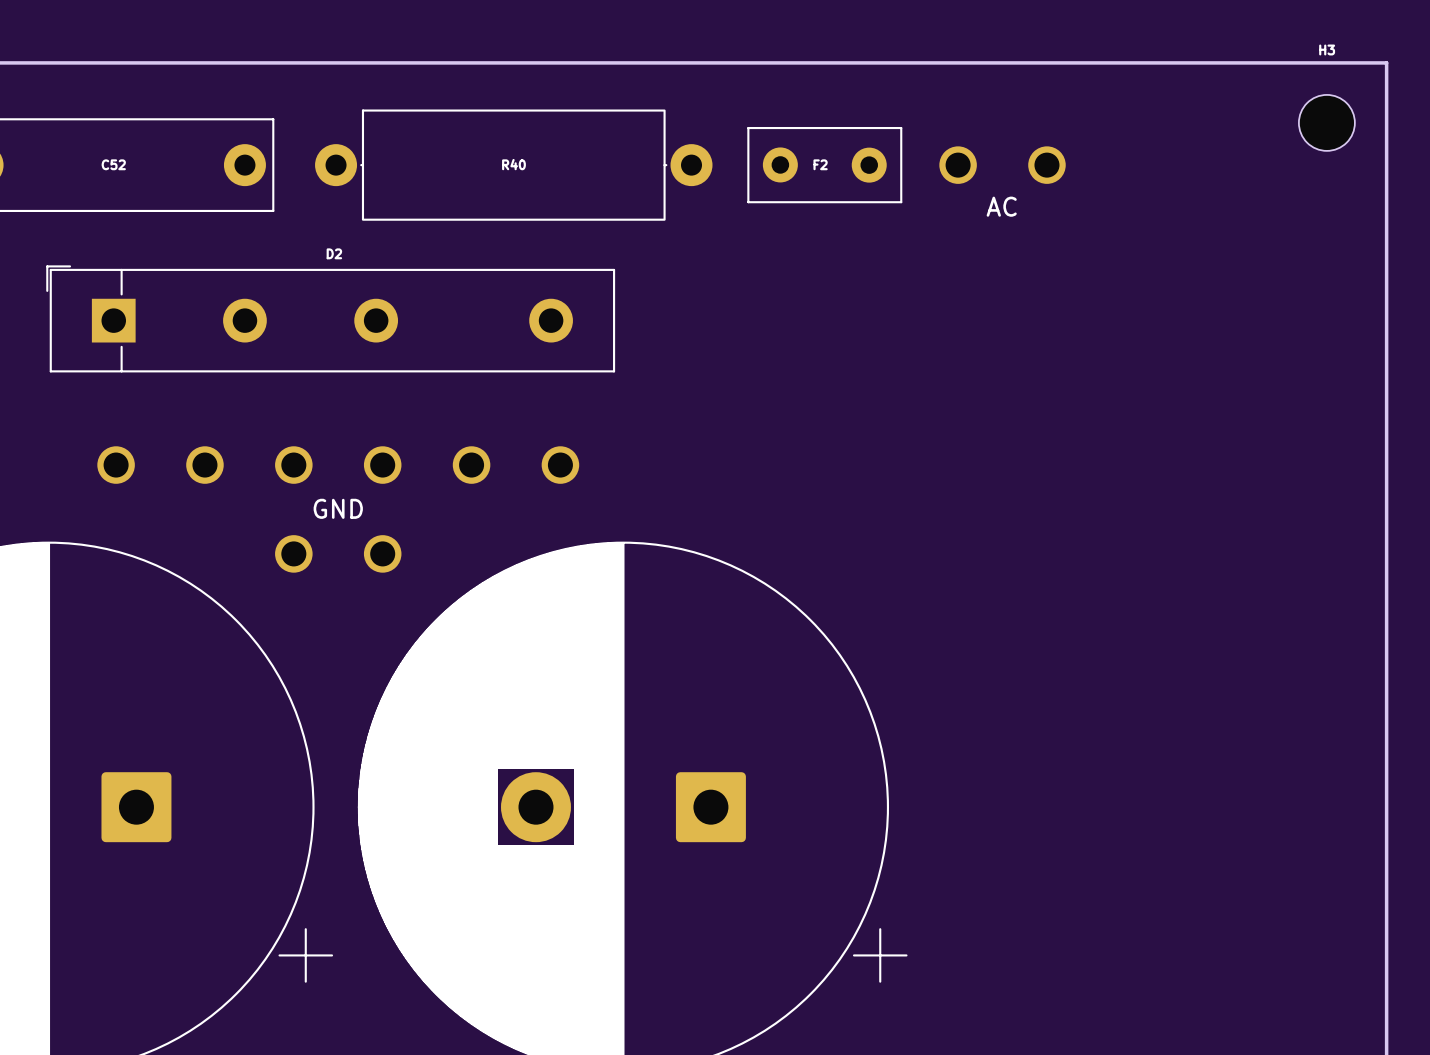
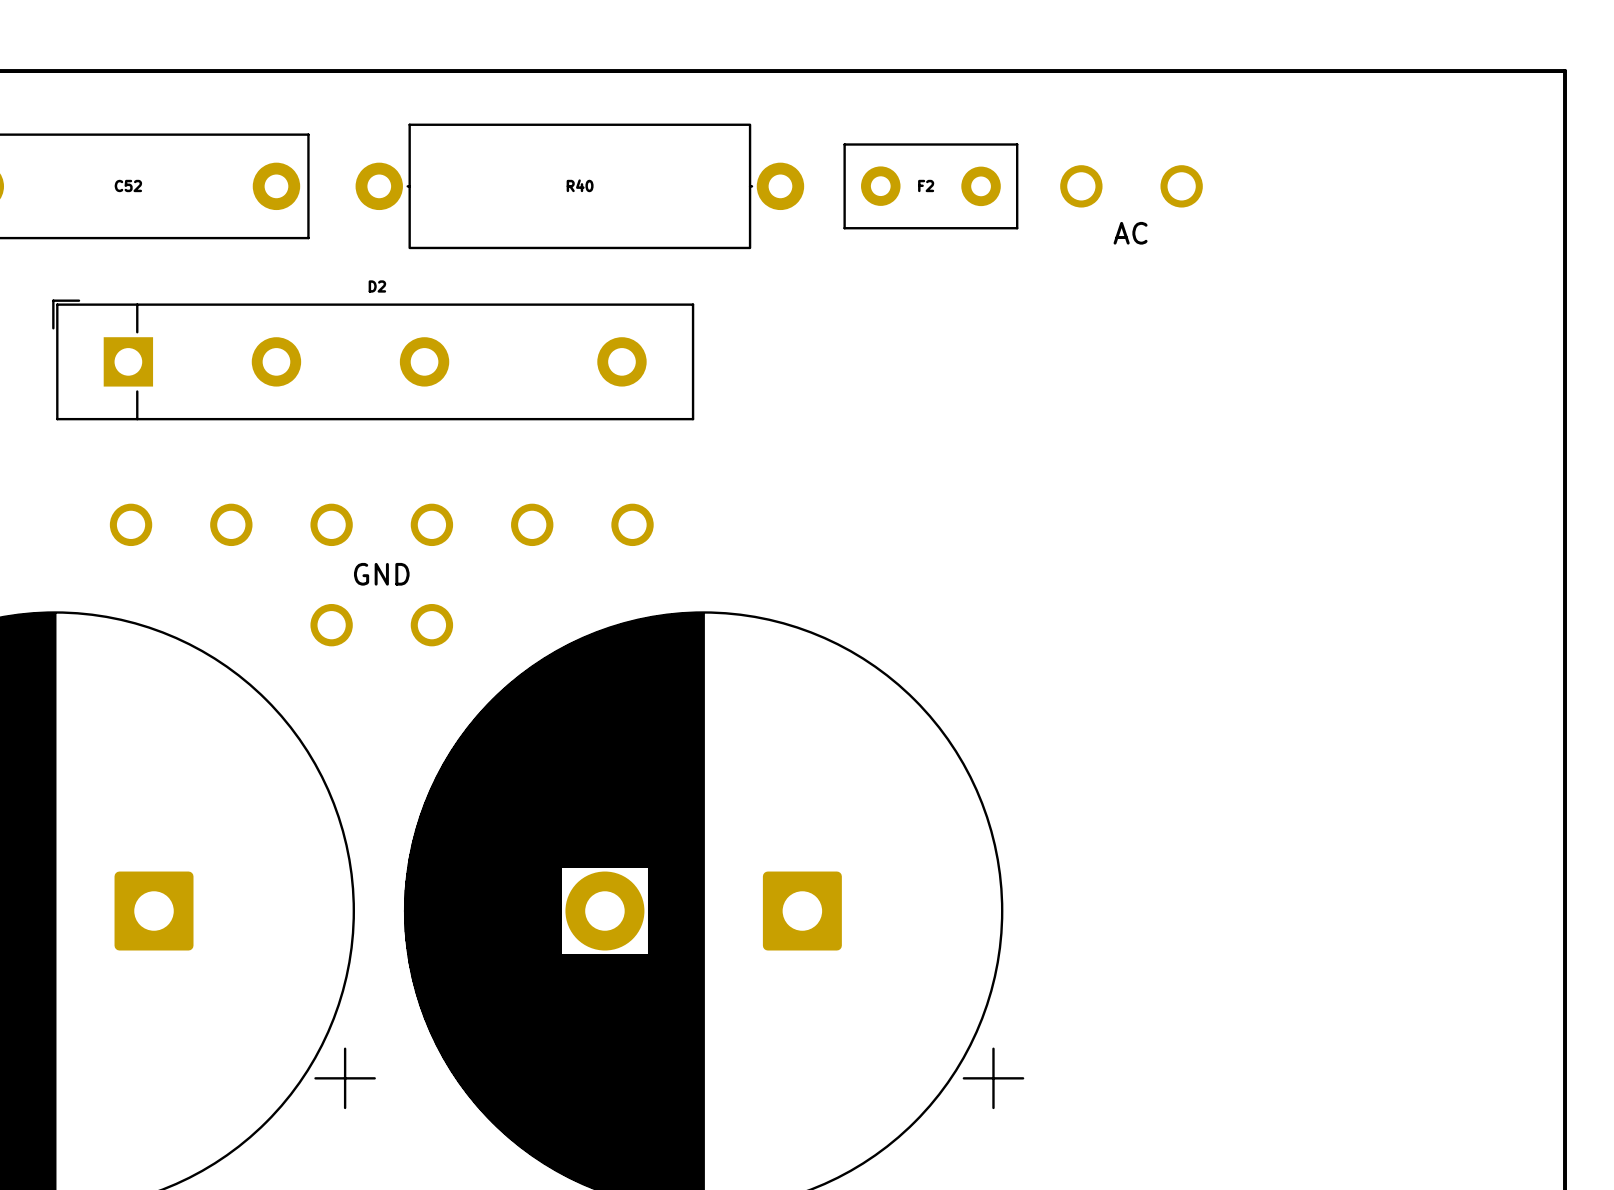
H3: (1326, 122) -> none

